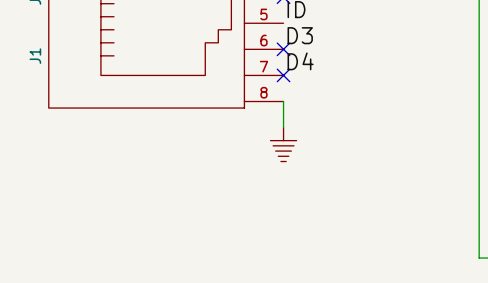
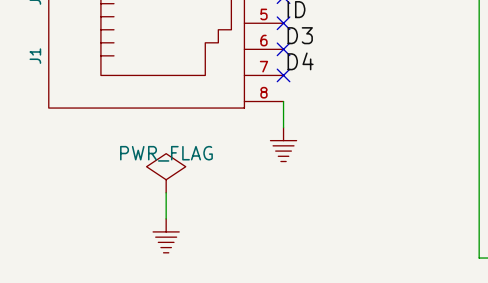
no-connect mark: none -> (283, 23)
power symbol: none -> PWR_FLAG (166, 173)
wire: none -> (166, 192) (166, 218)
power symbol: none -> (166, 235)

